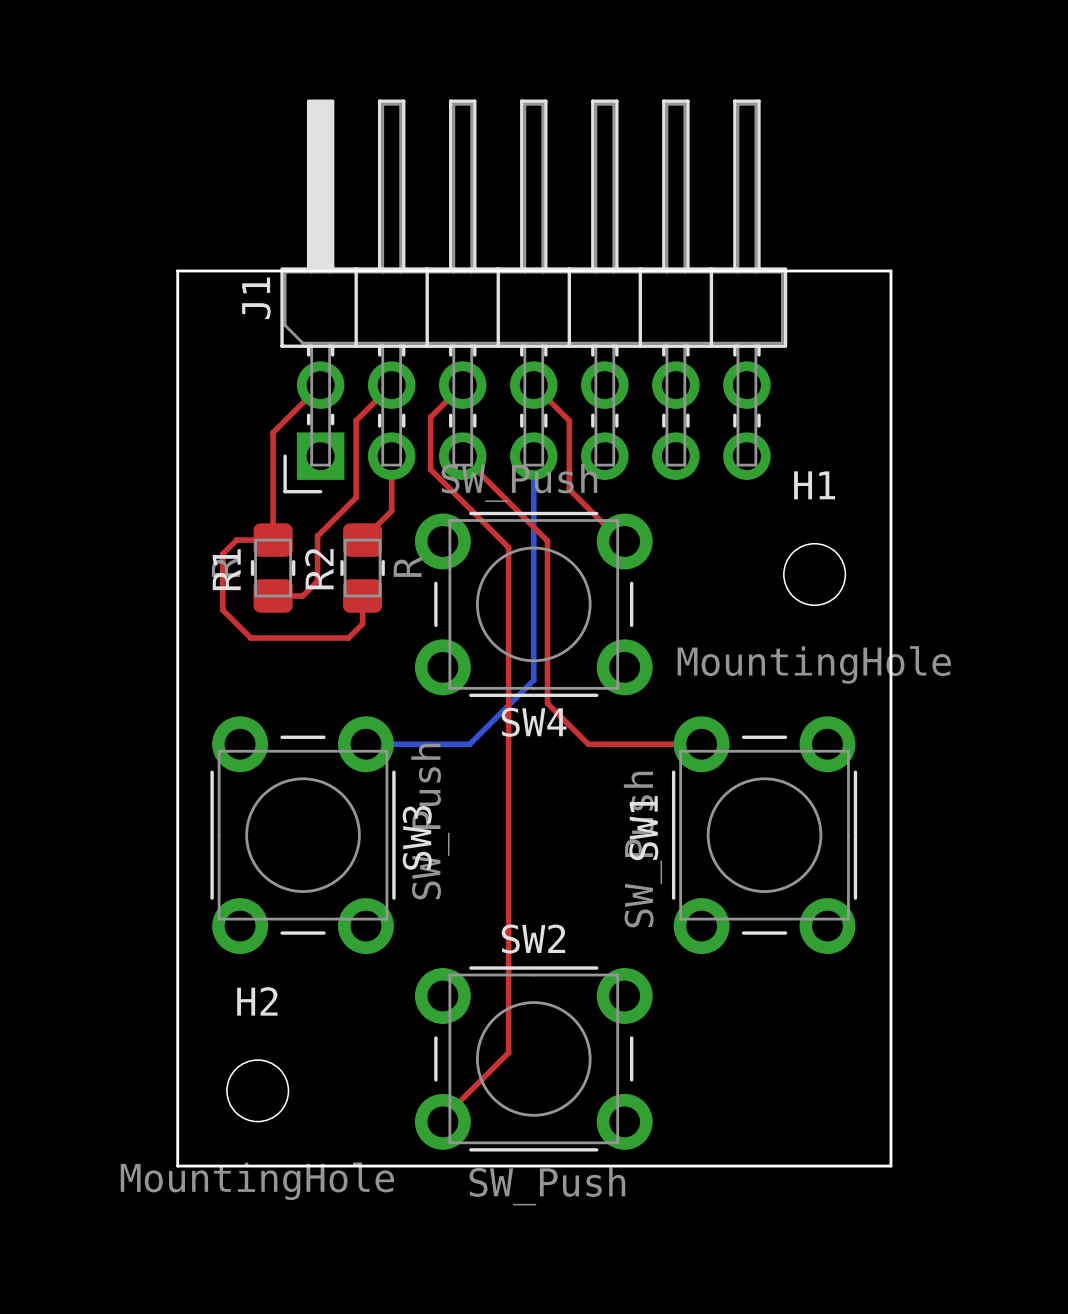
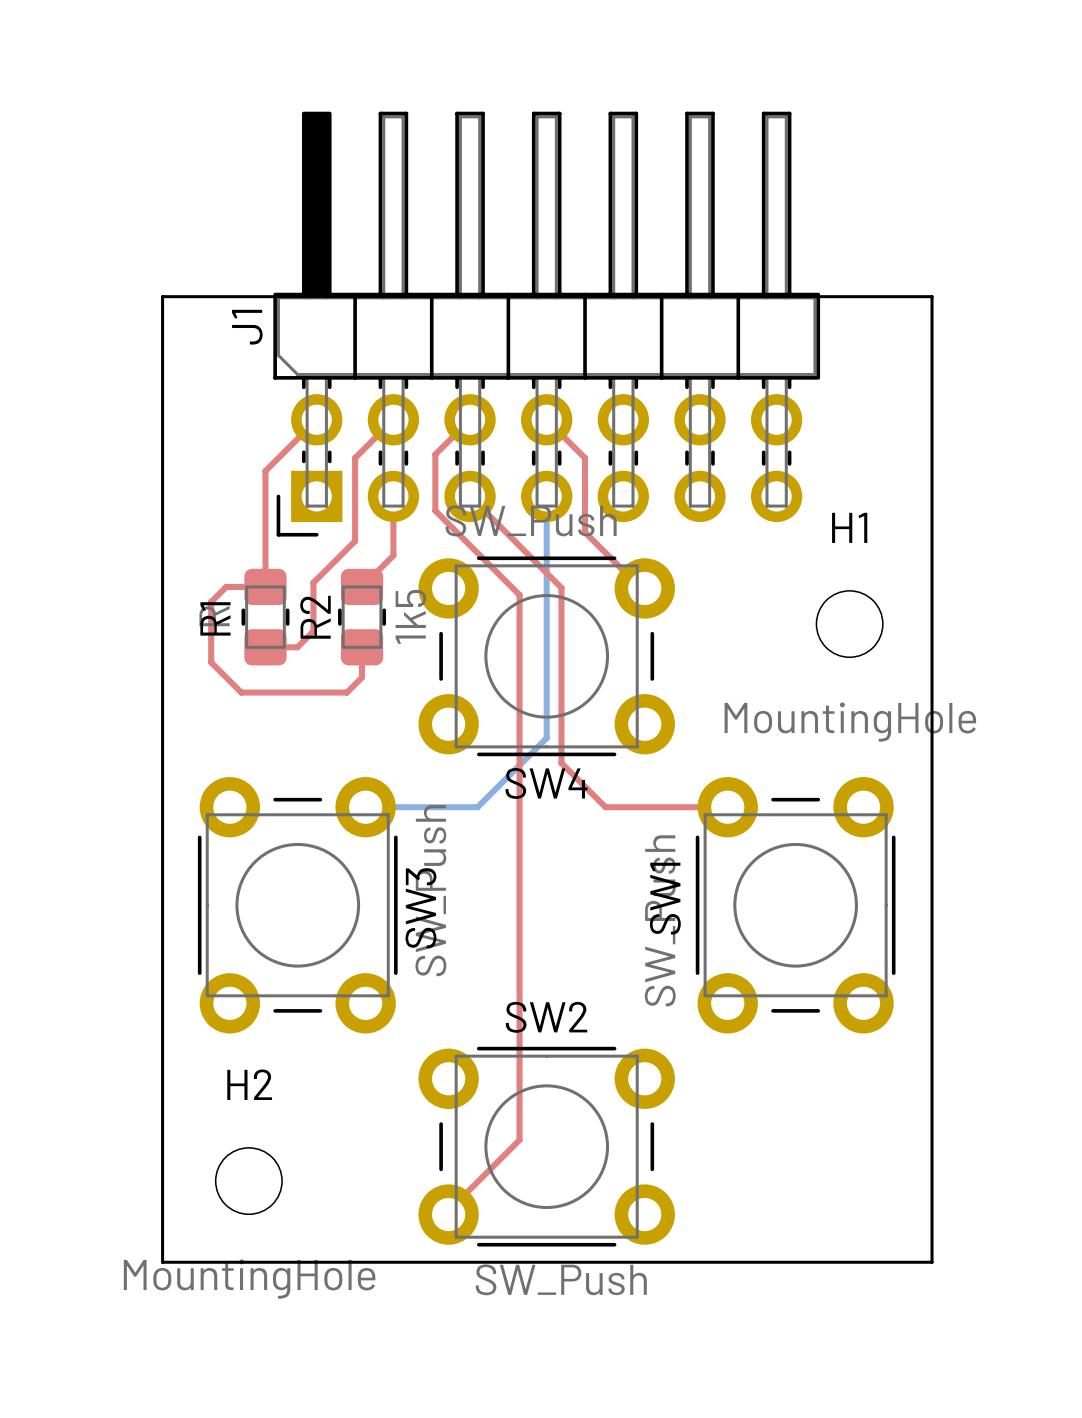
R2 value: R (407, 566) -> 1k5 (410, 616)

